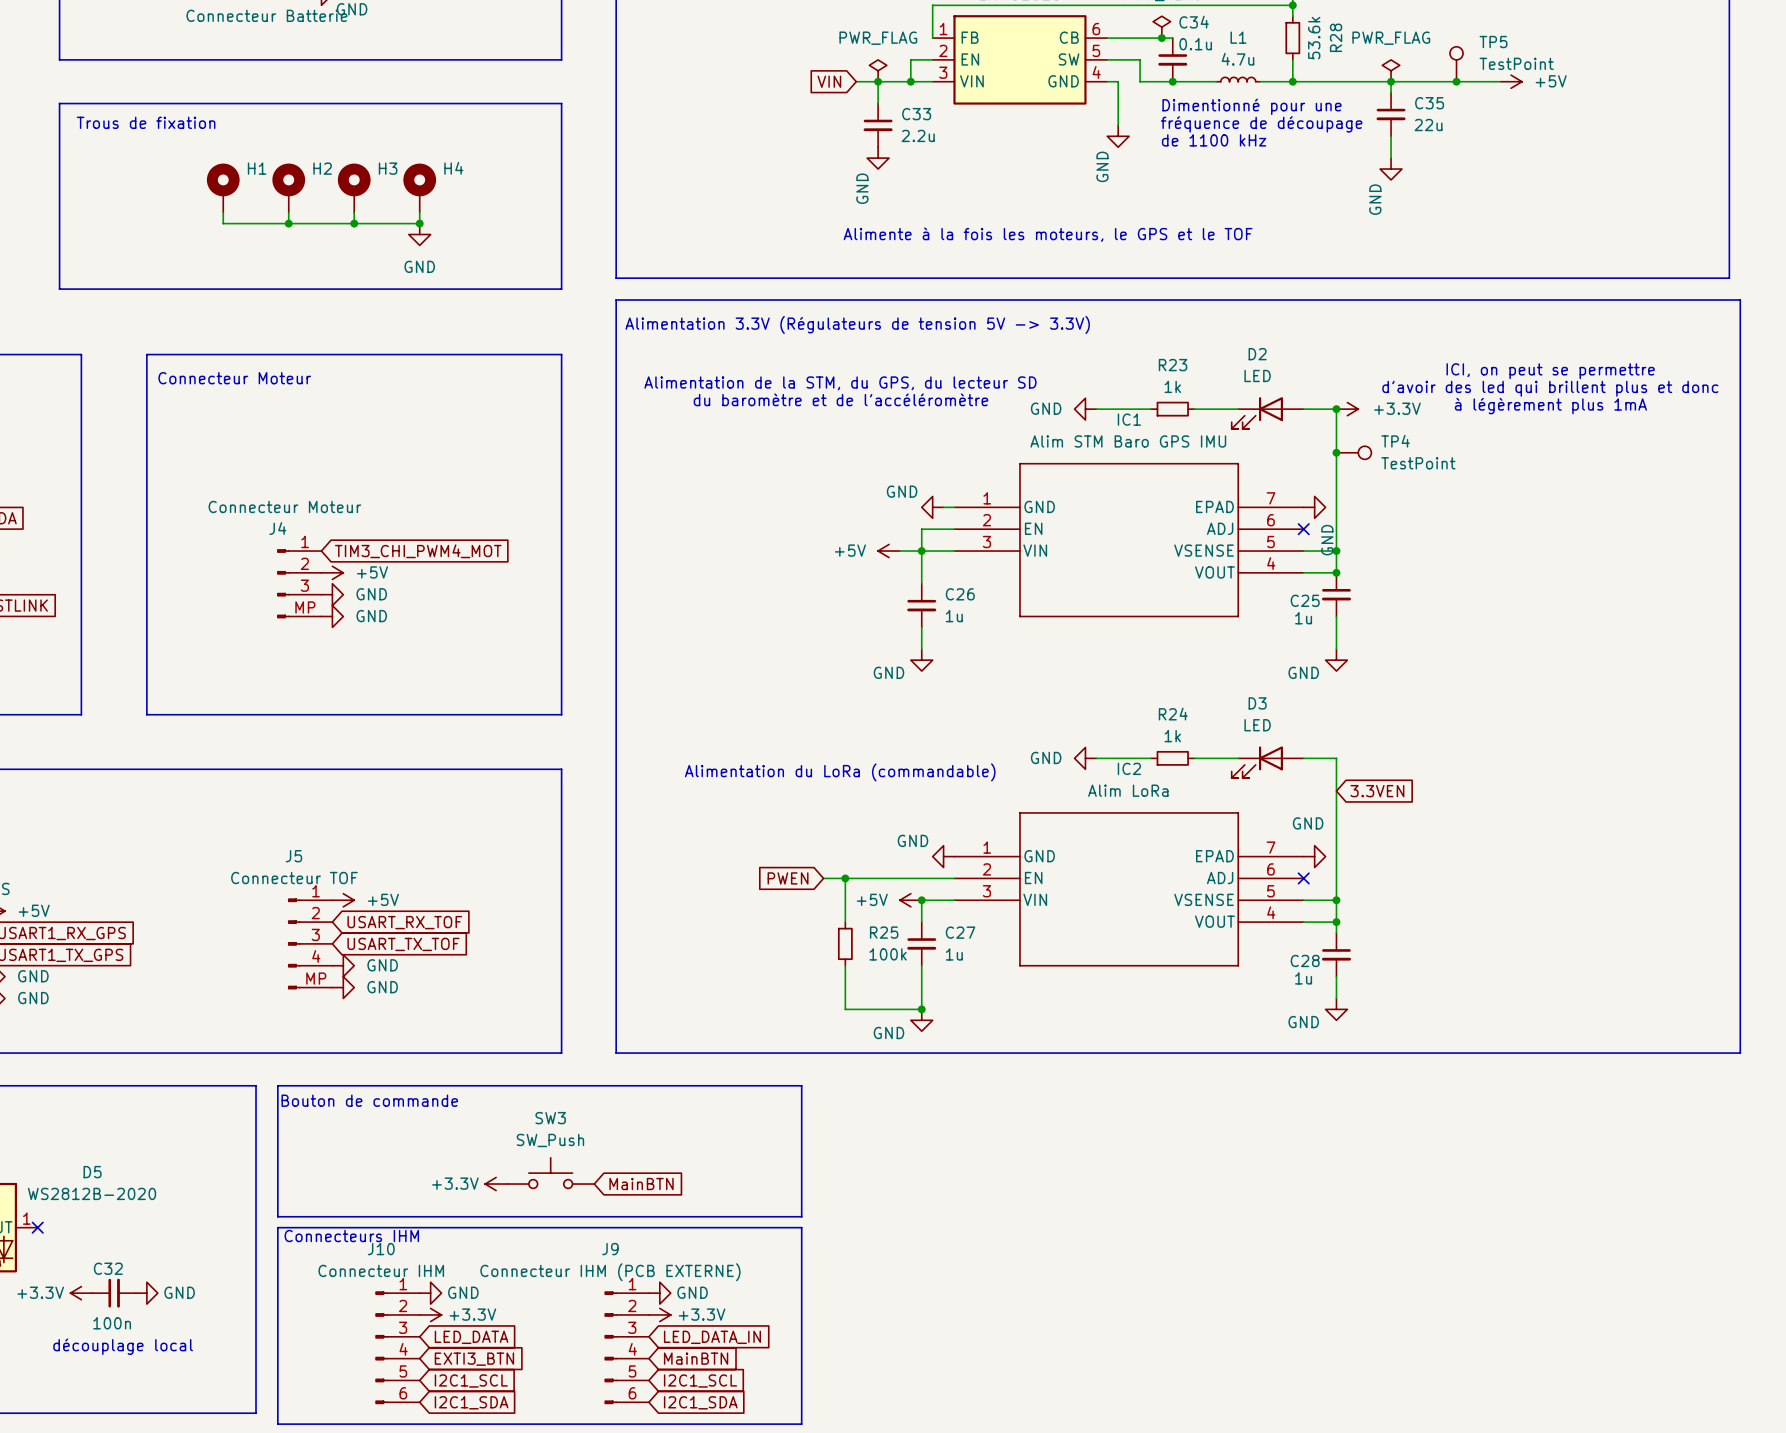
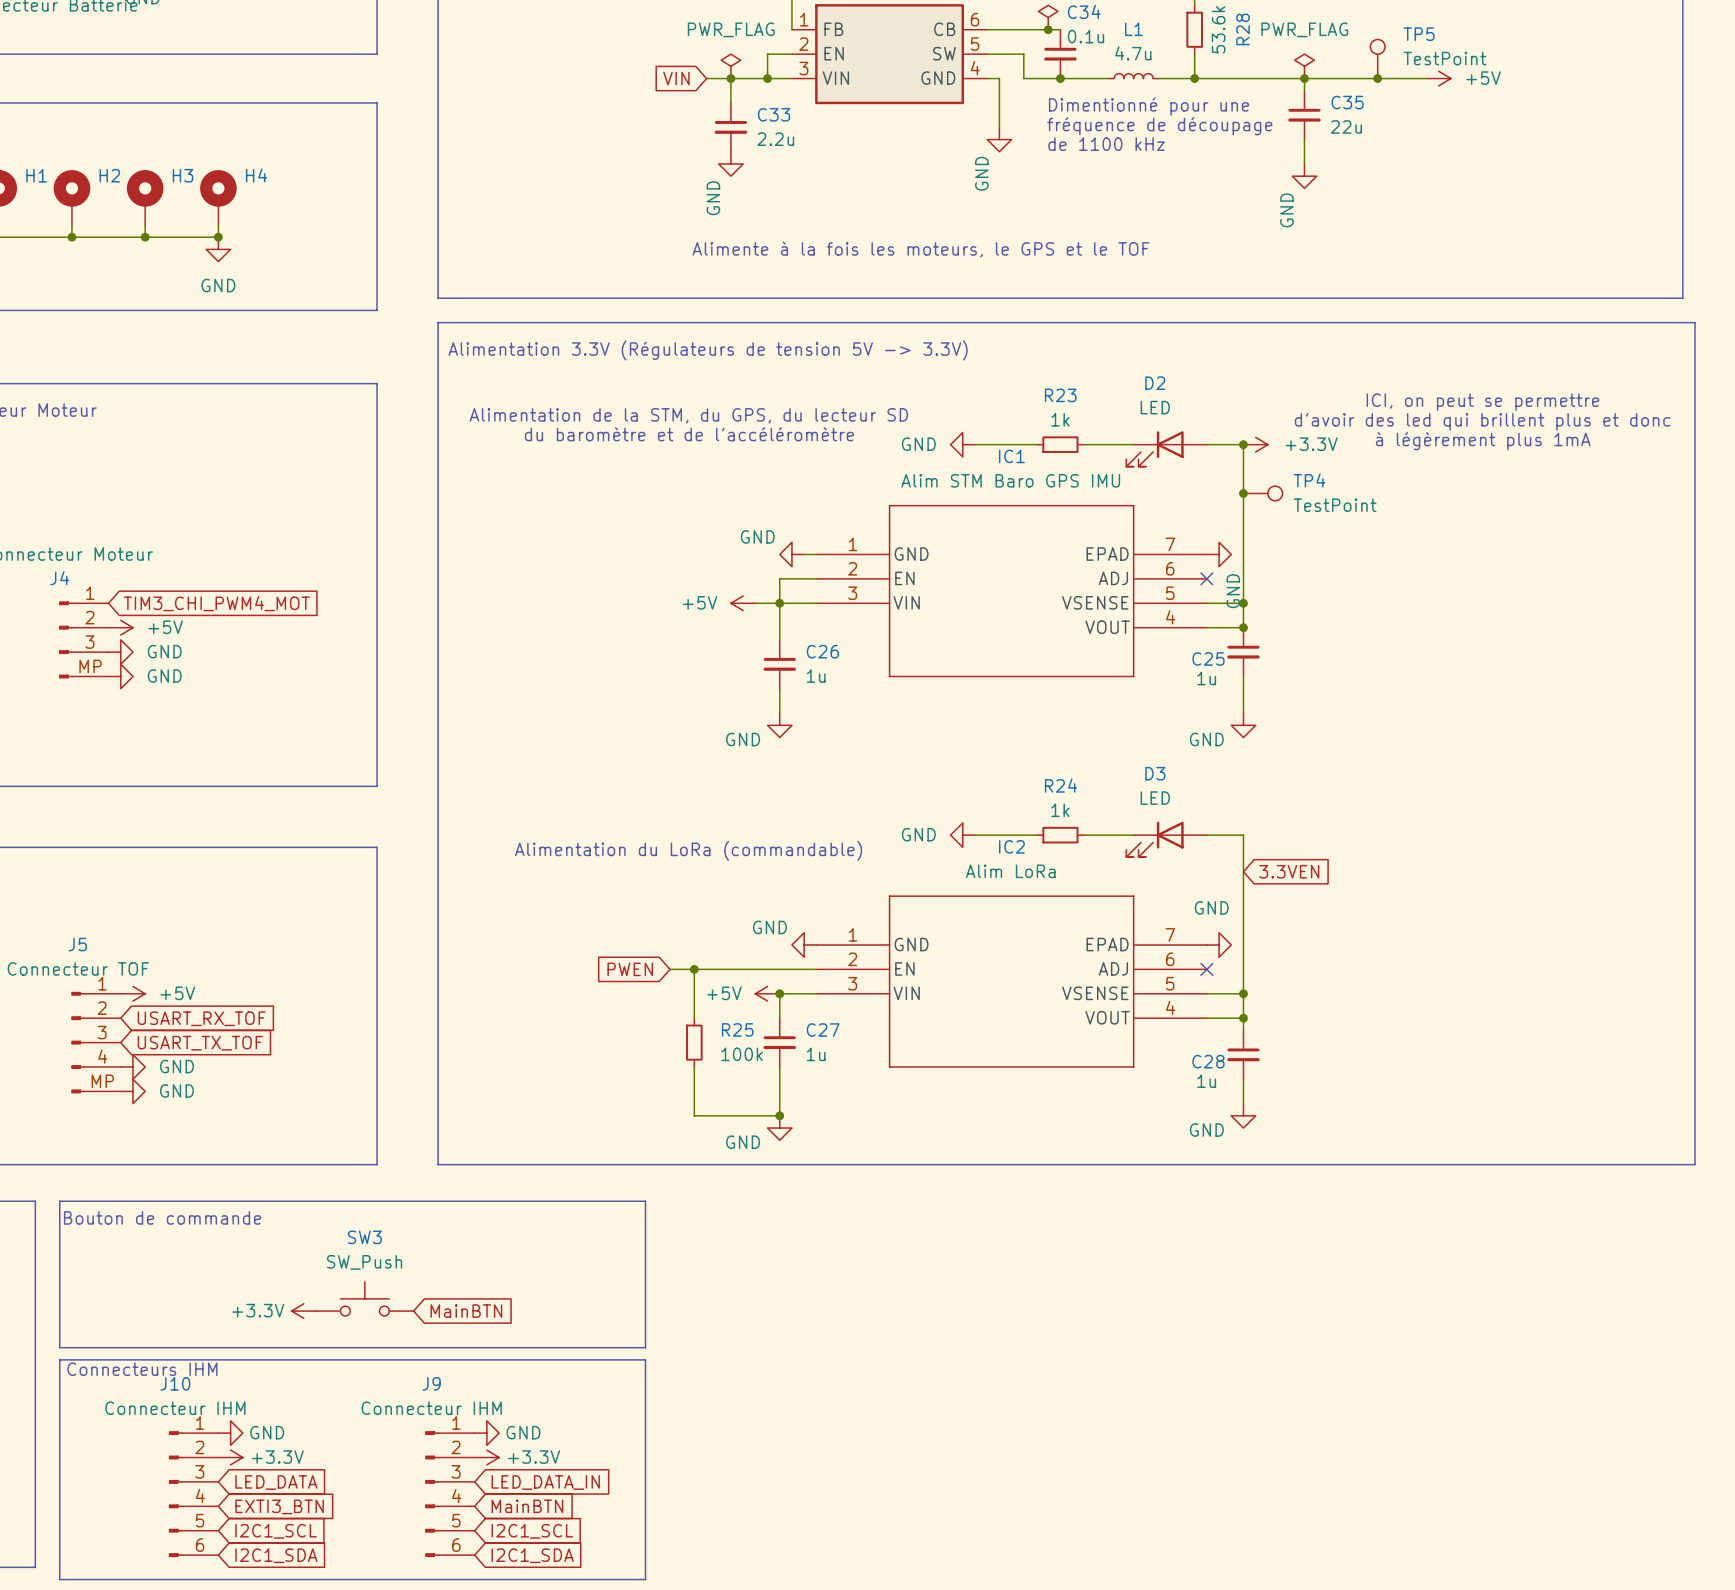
J9 value: Connecteur IHM (PCB EXTERNE) (610, 1272) -> Connecteur IHM (431, 1408)

